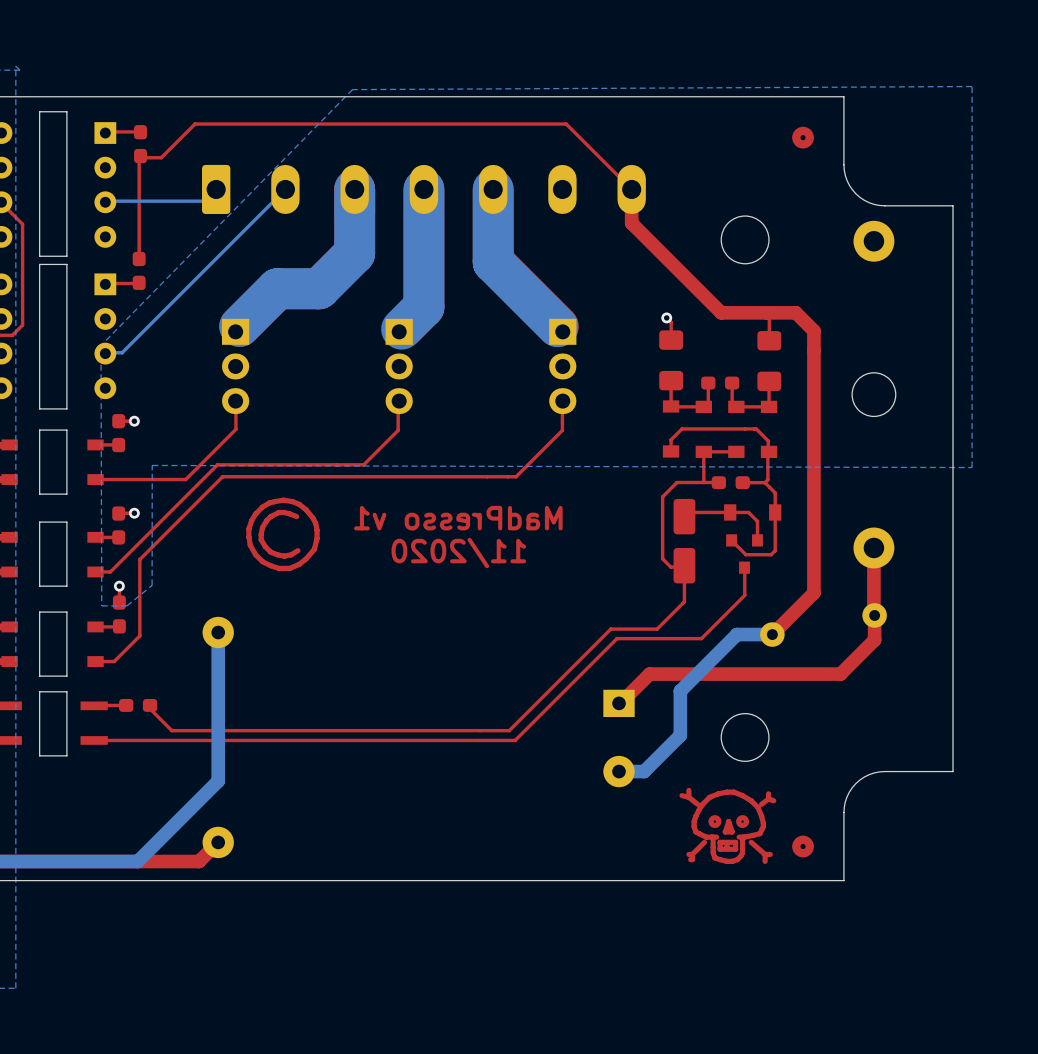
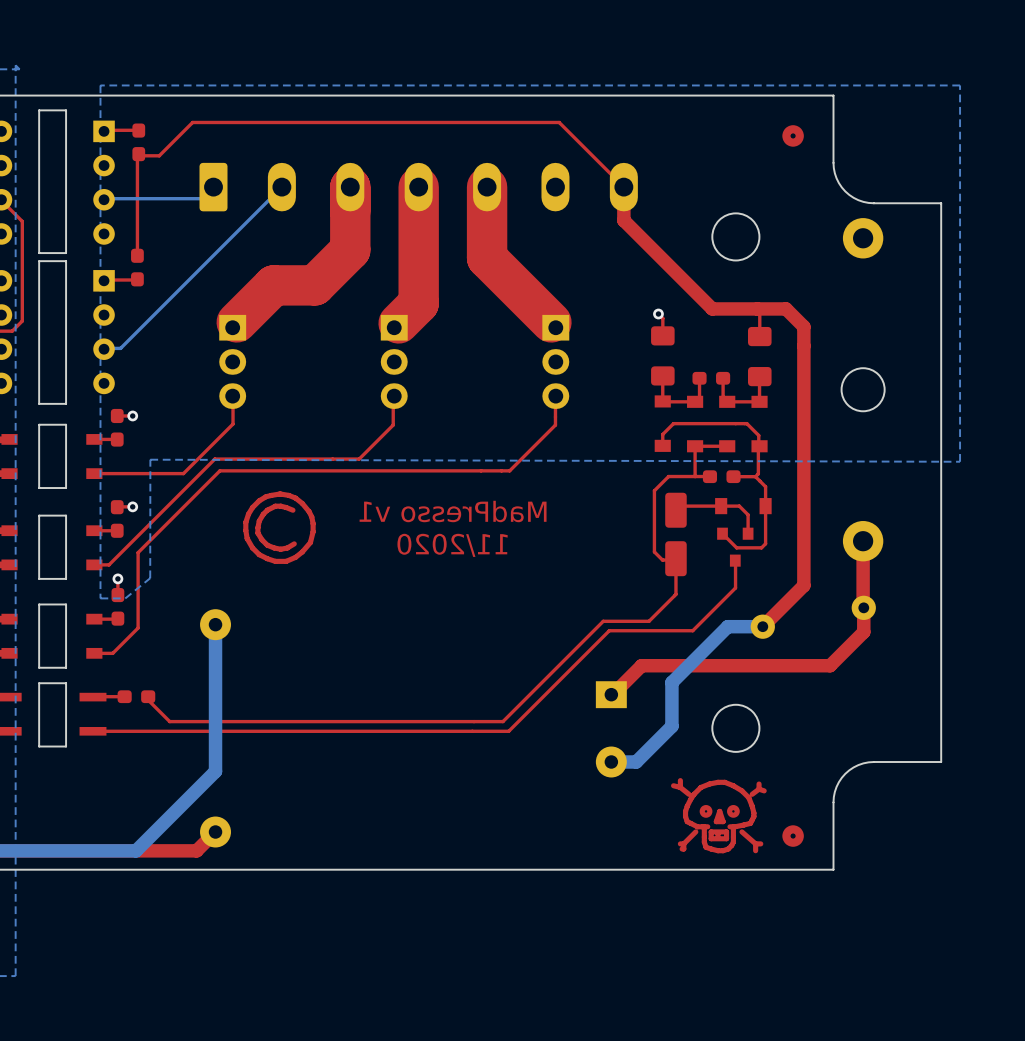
bottom zone outline: (972, 86) (352, 89) (100, 345) (101, 605) -> (960, 85) (100, 85) (100, 598)
bottom track: (354, 189) (354, 253) (319, 288) (277, 288) (239, 326) -> none
bottom track: (423, 189) (423, 306) (401, 329) -> none
bottom track: (493, 189) (493, 262) (557, 326) -> none

